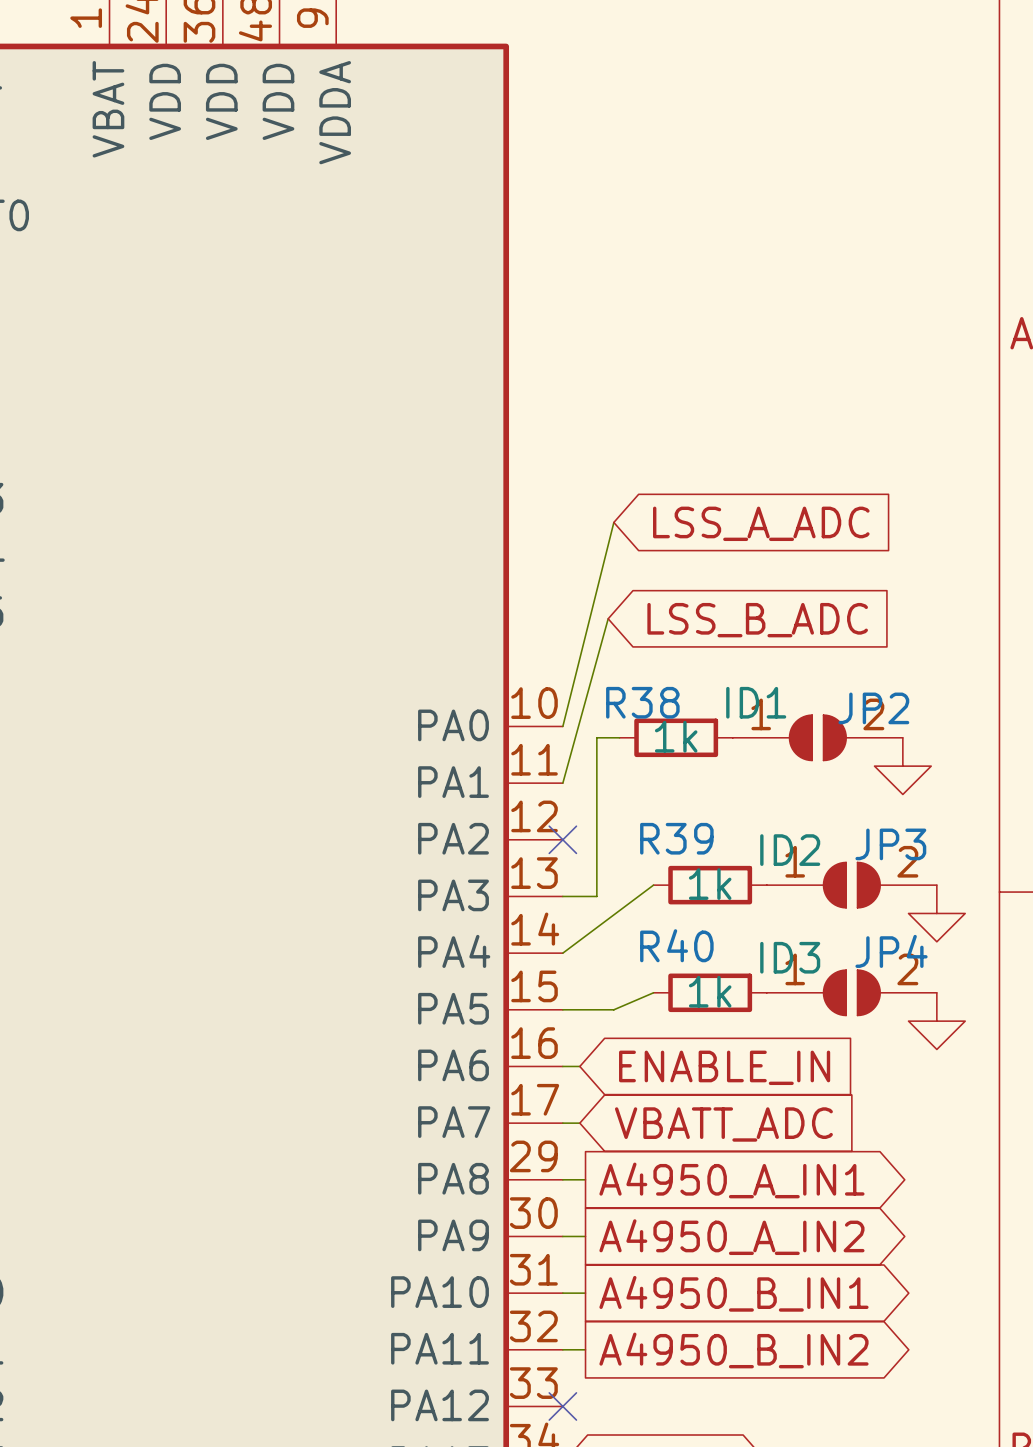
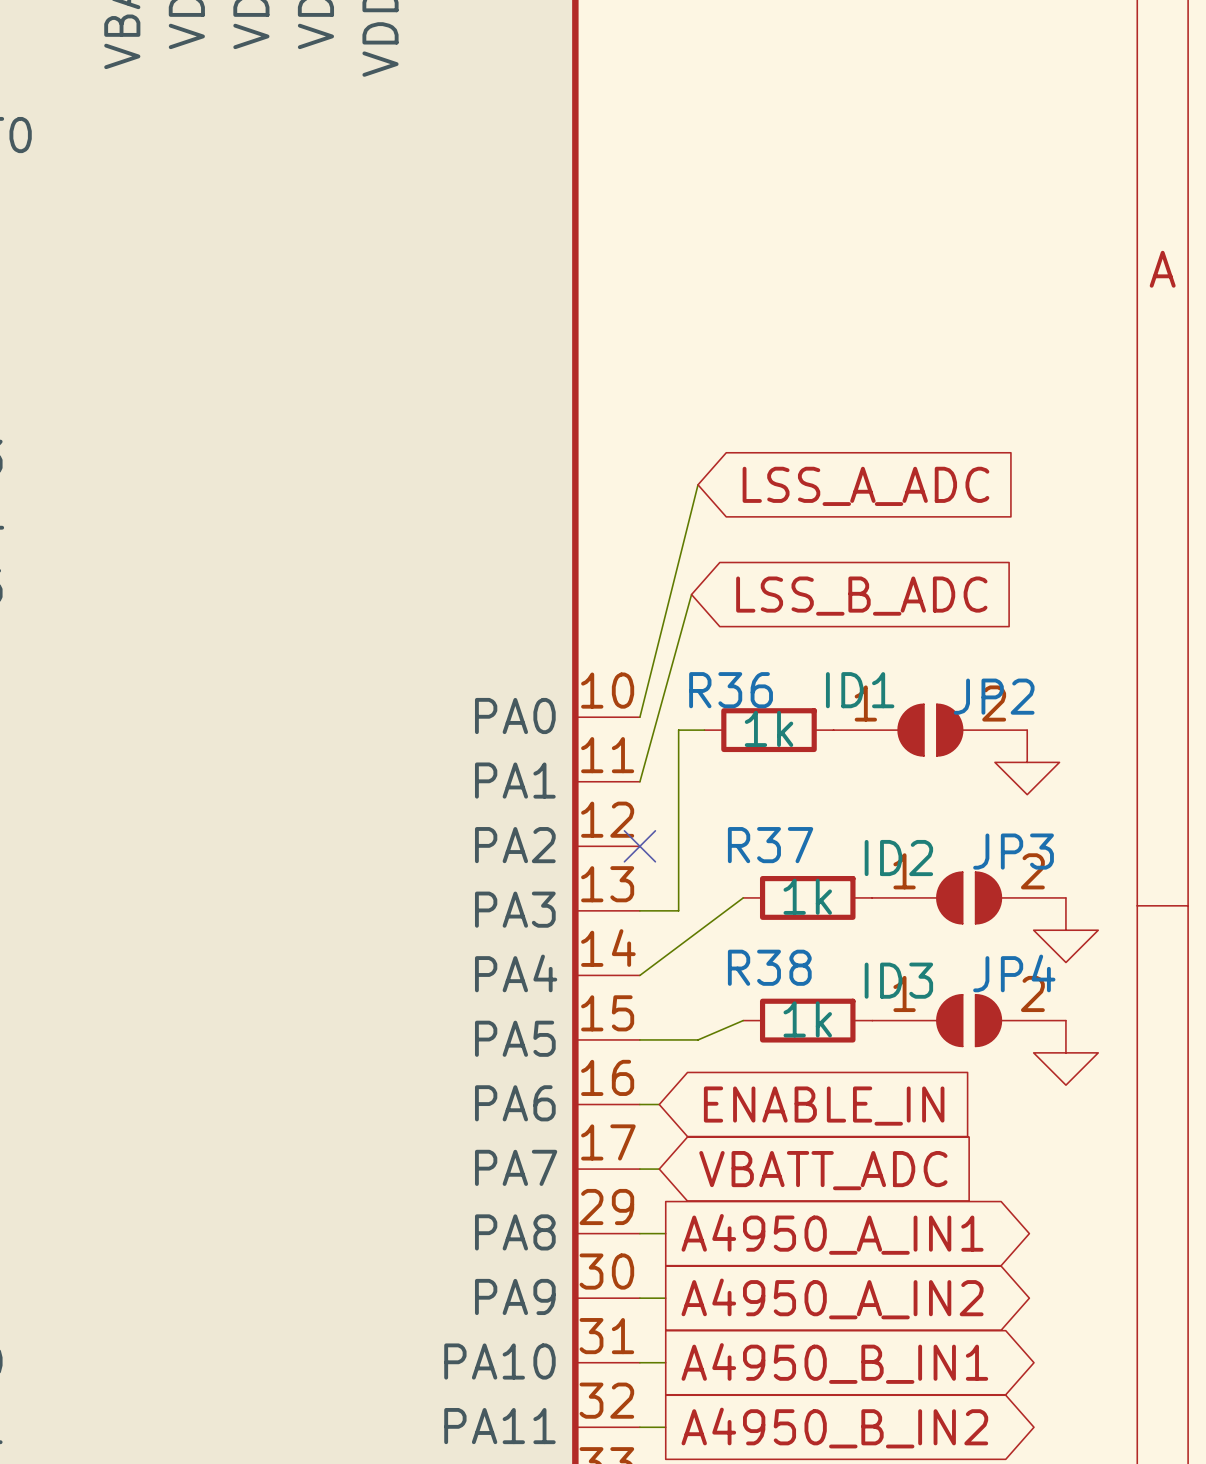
R38 name: R38 (642, 702) -> R36 (731, 690)
R39 name: R39 (676, 838) -> R37 (770, 845)
R40 name: R40 (676, 945) -> R38 (769, 967)

